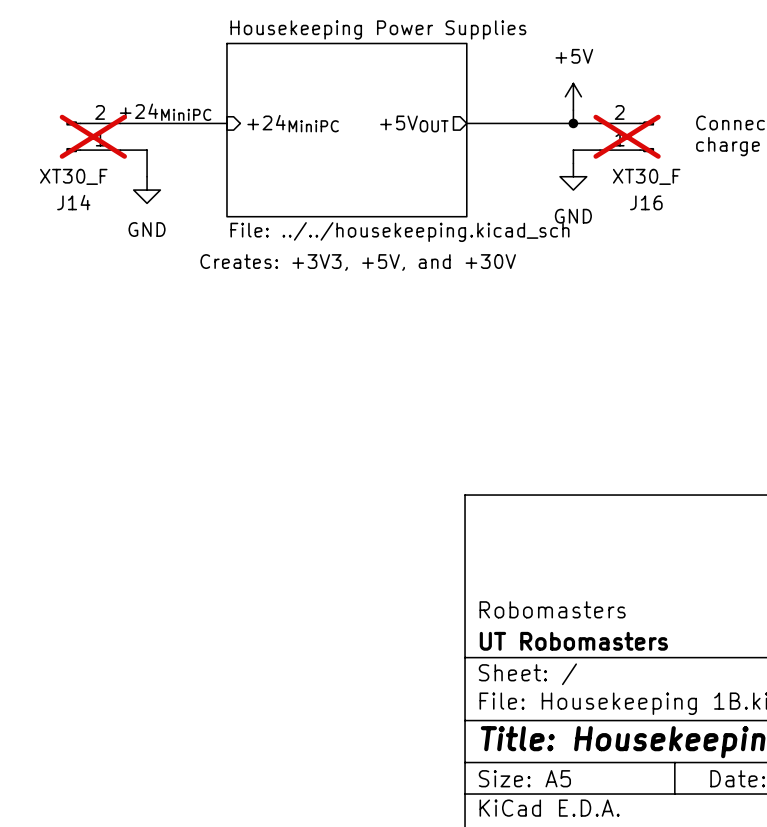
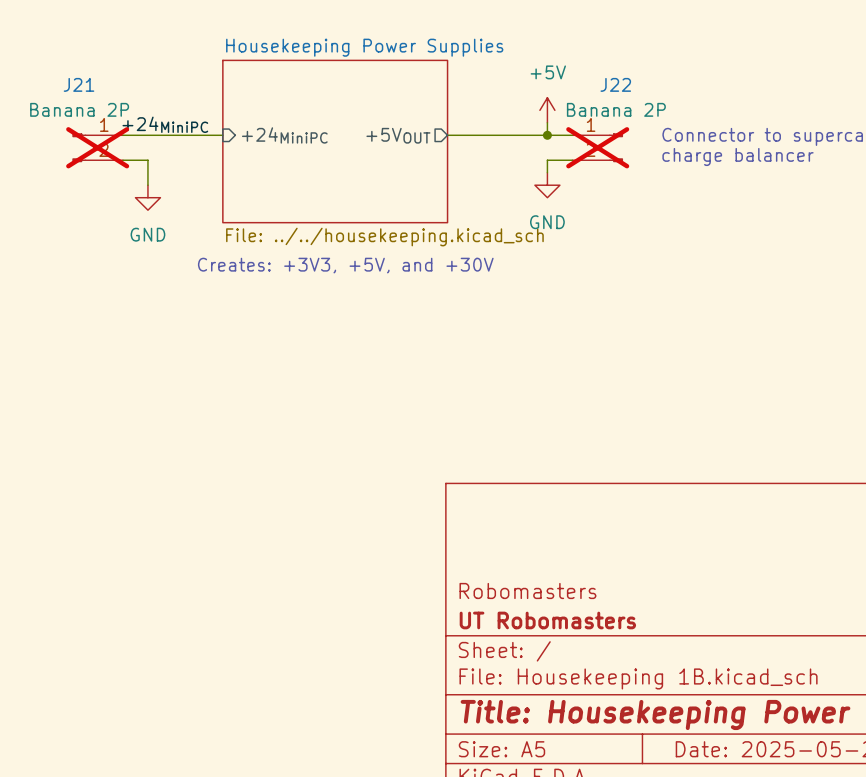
J14 flip: as is (73, 136) -> up-down (79, 147)
J16 flip: as is (646, 136) -> up-down (616, 147)
J14 value: XT30_F (73, 176) -> Banana 2P (79, 109)
J16 value: XT30_F (646, 176) -> Banana 2P (616, 109)
J14 name: J14 (73, 202) -> J21 (79, 84)
J16 name: J16 (646, 202) -> J22 (615, 84)

